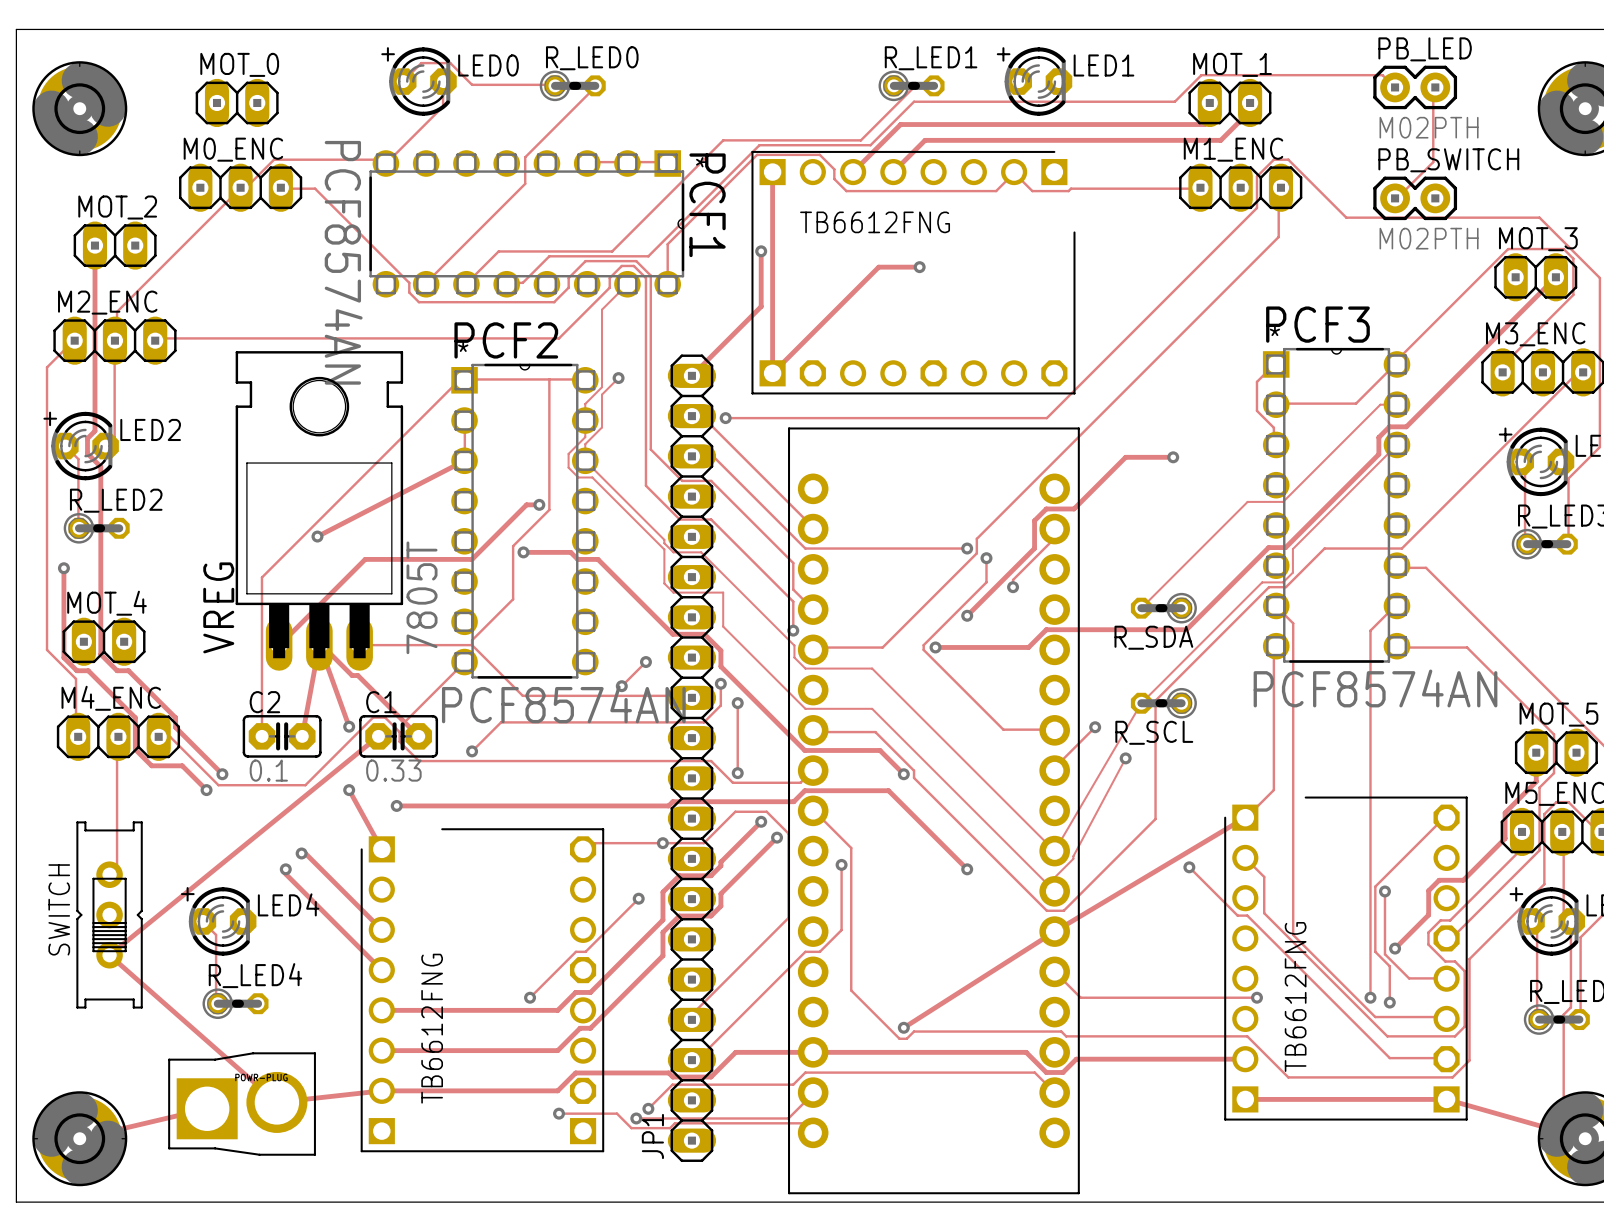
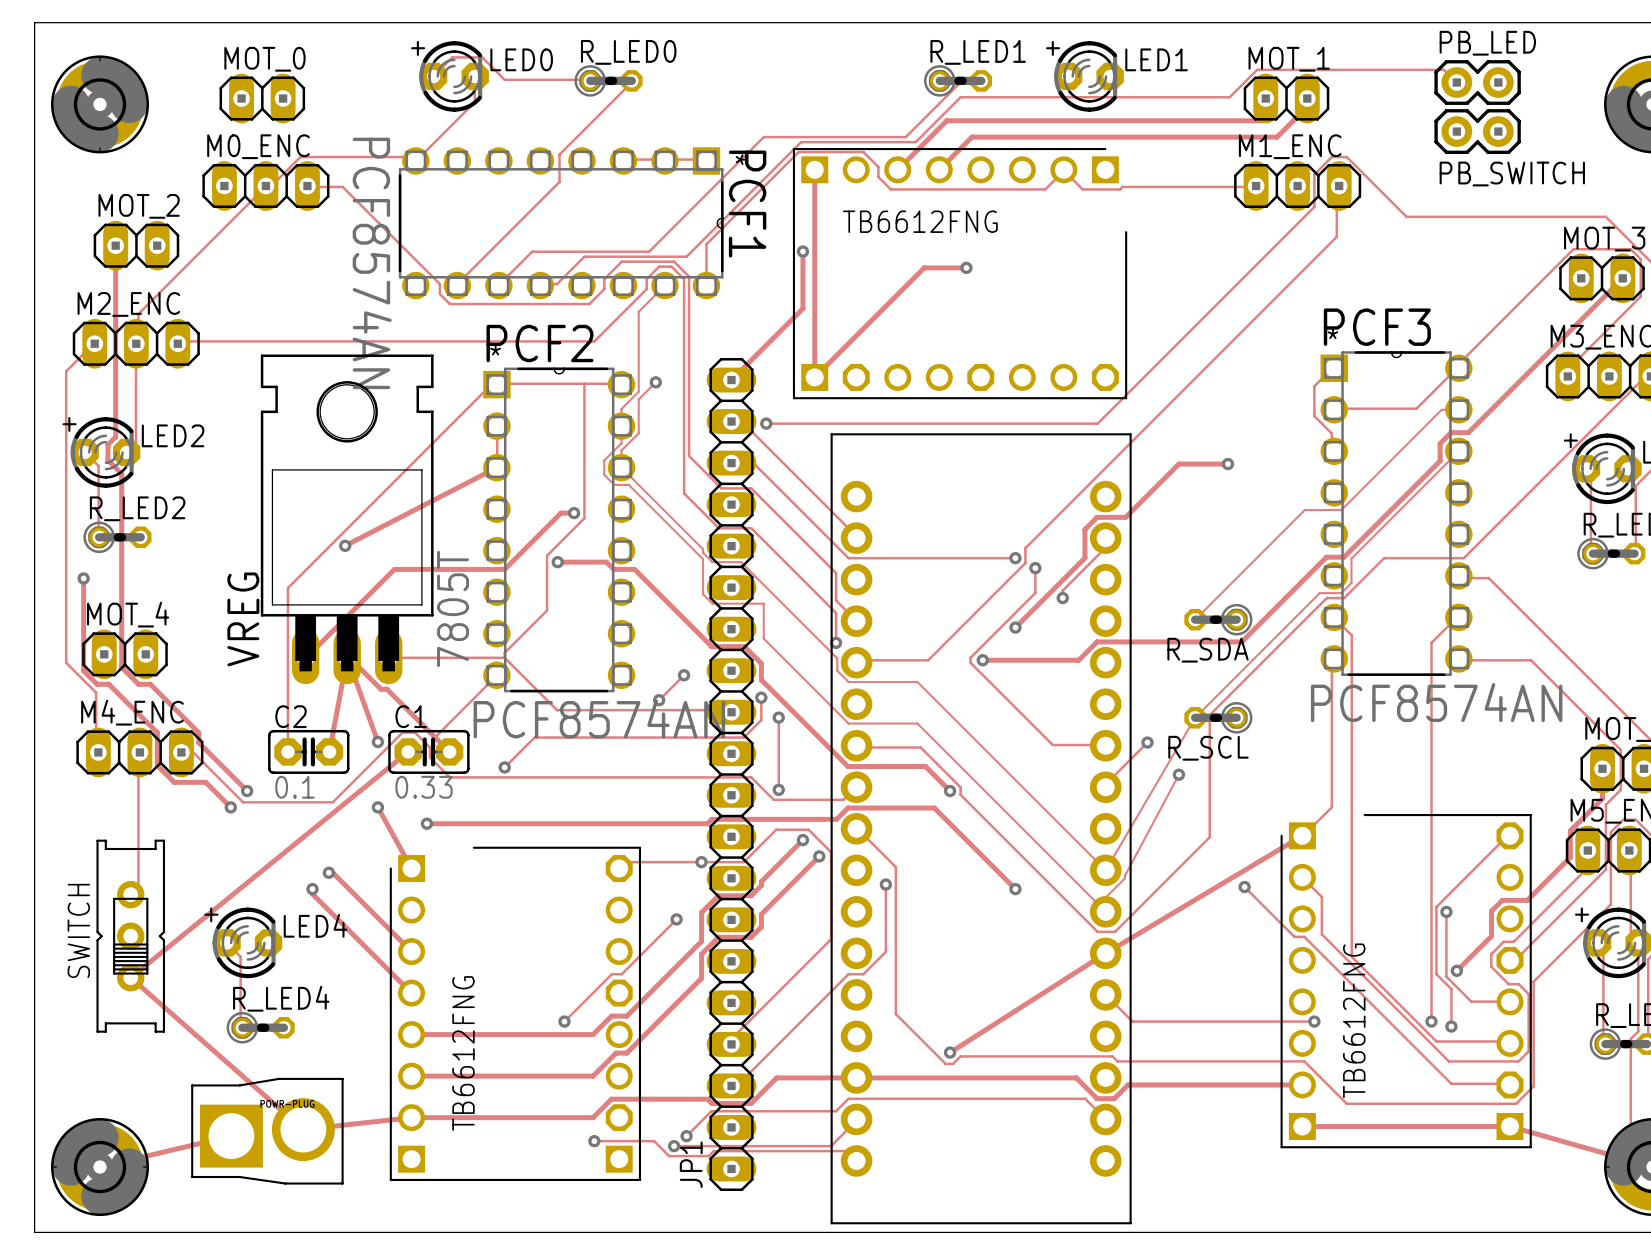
track: (1433, 89) (1433, 162) (1395, 198) -> none
PB_LED value: M02PTH (1429, 127) -> none
PB_SWITCH: none -> (1477, 131)
PB_SWITCH: M02PTH (1415, 198) -> none

